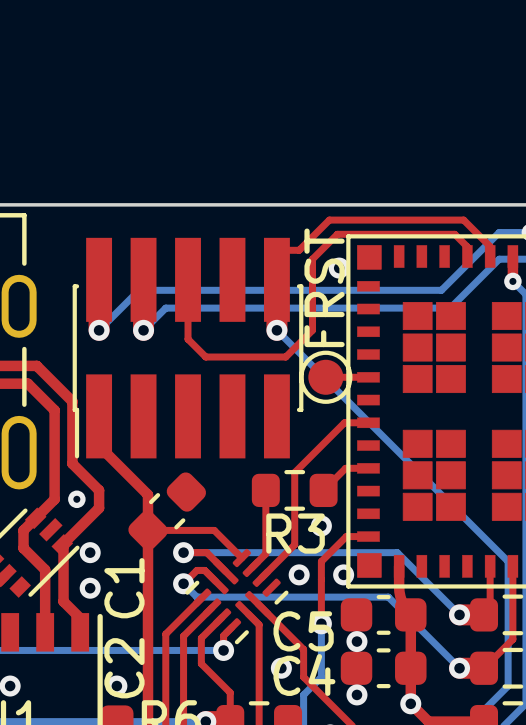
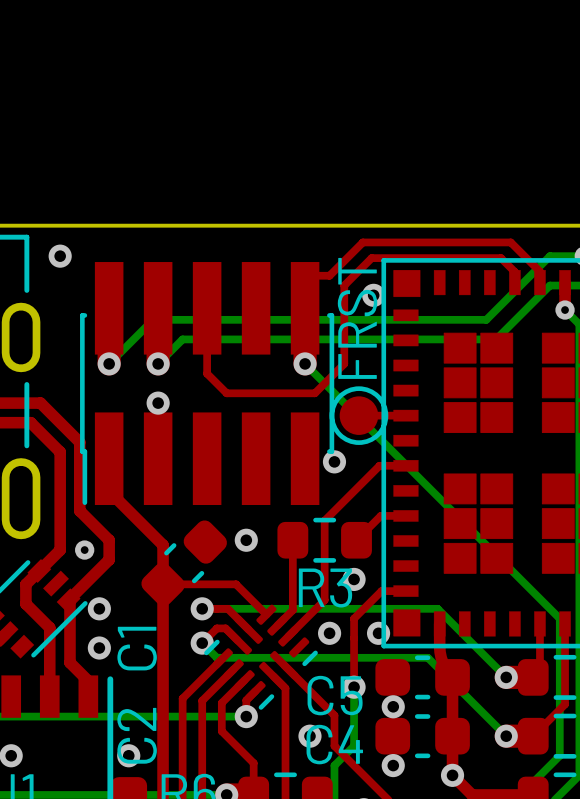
via: none -> (60, 256)
via: none -> (158, 403)
via: none -> (334, 461)
via: none -> (246, 540)

